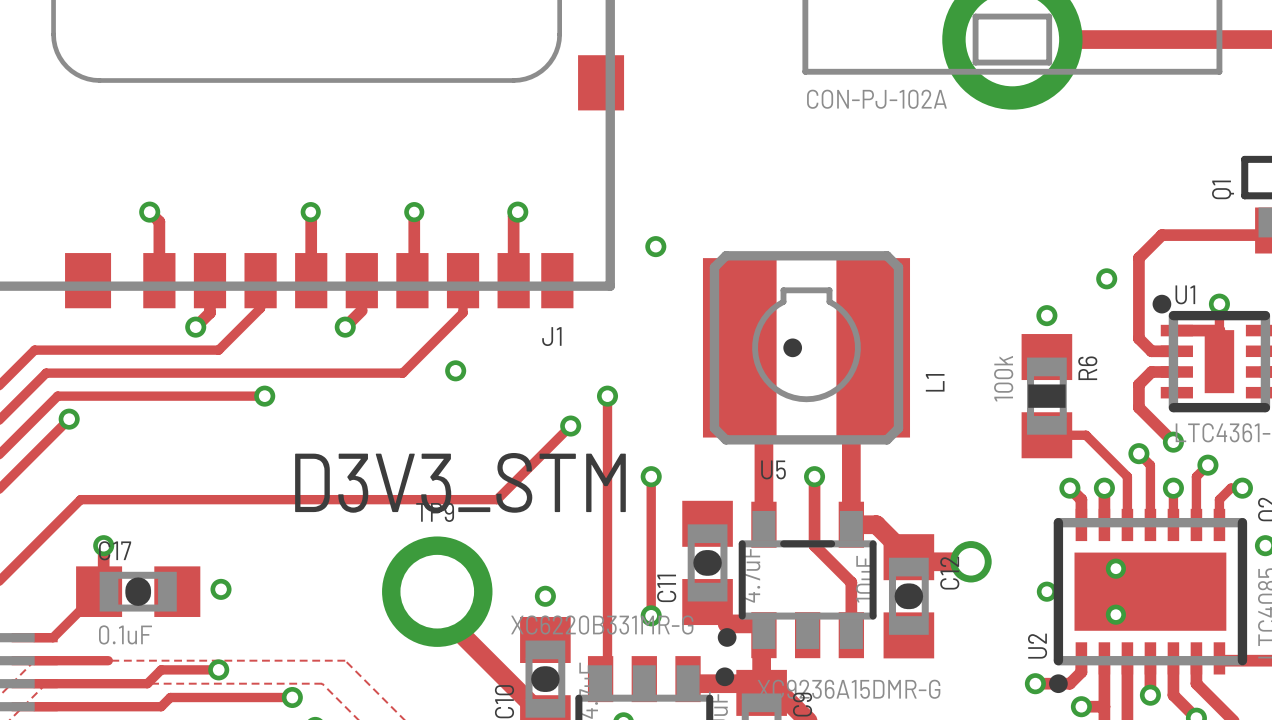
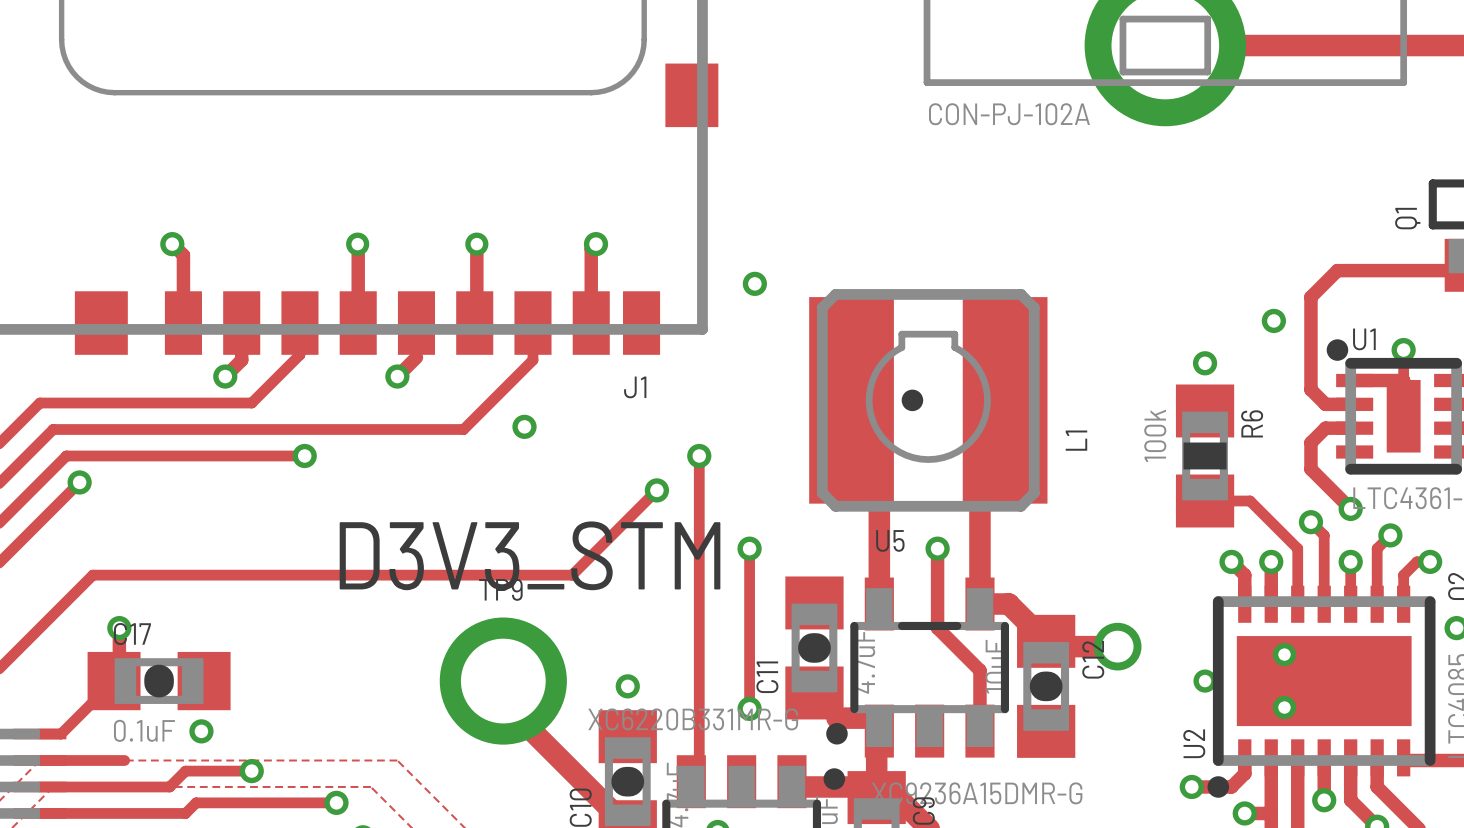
via position: (221, 589) -> (201, 731)

